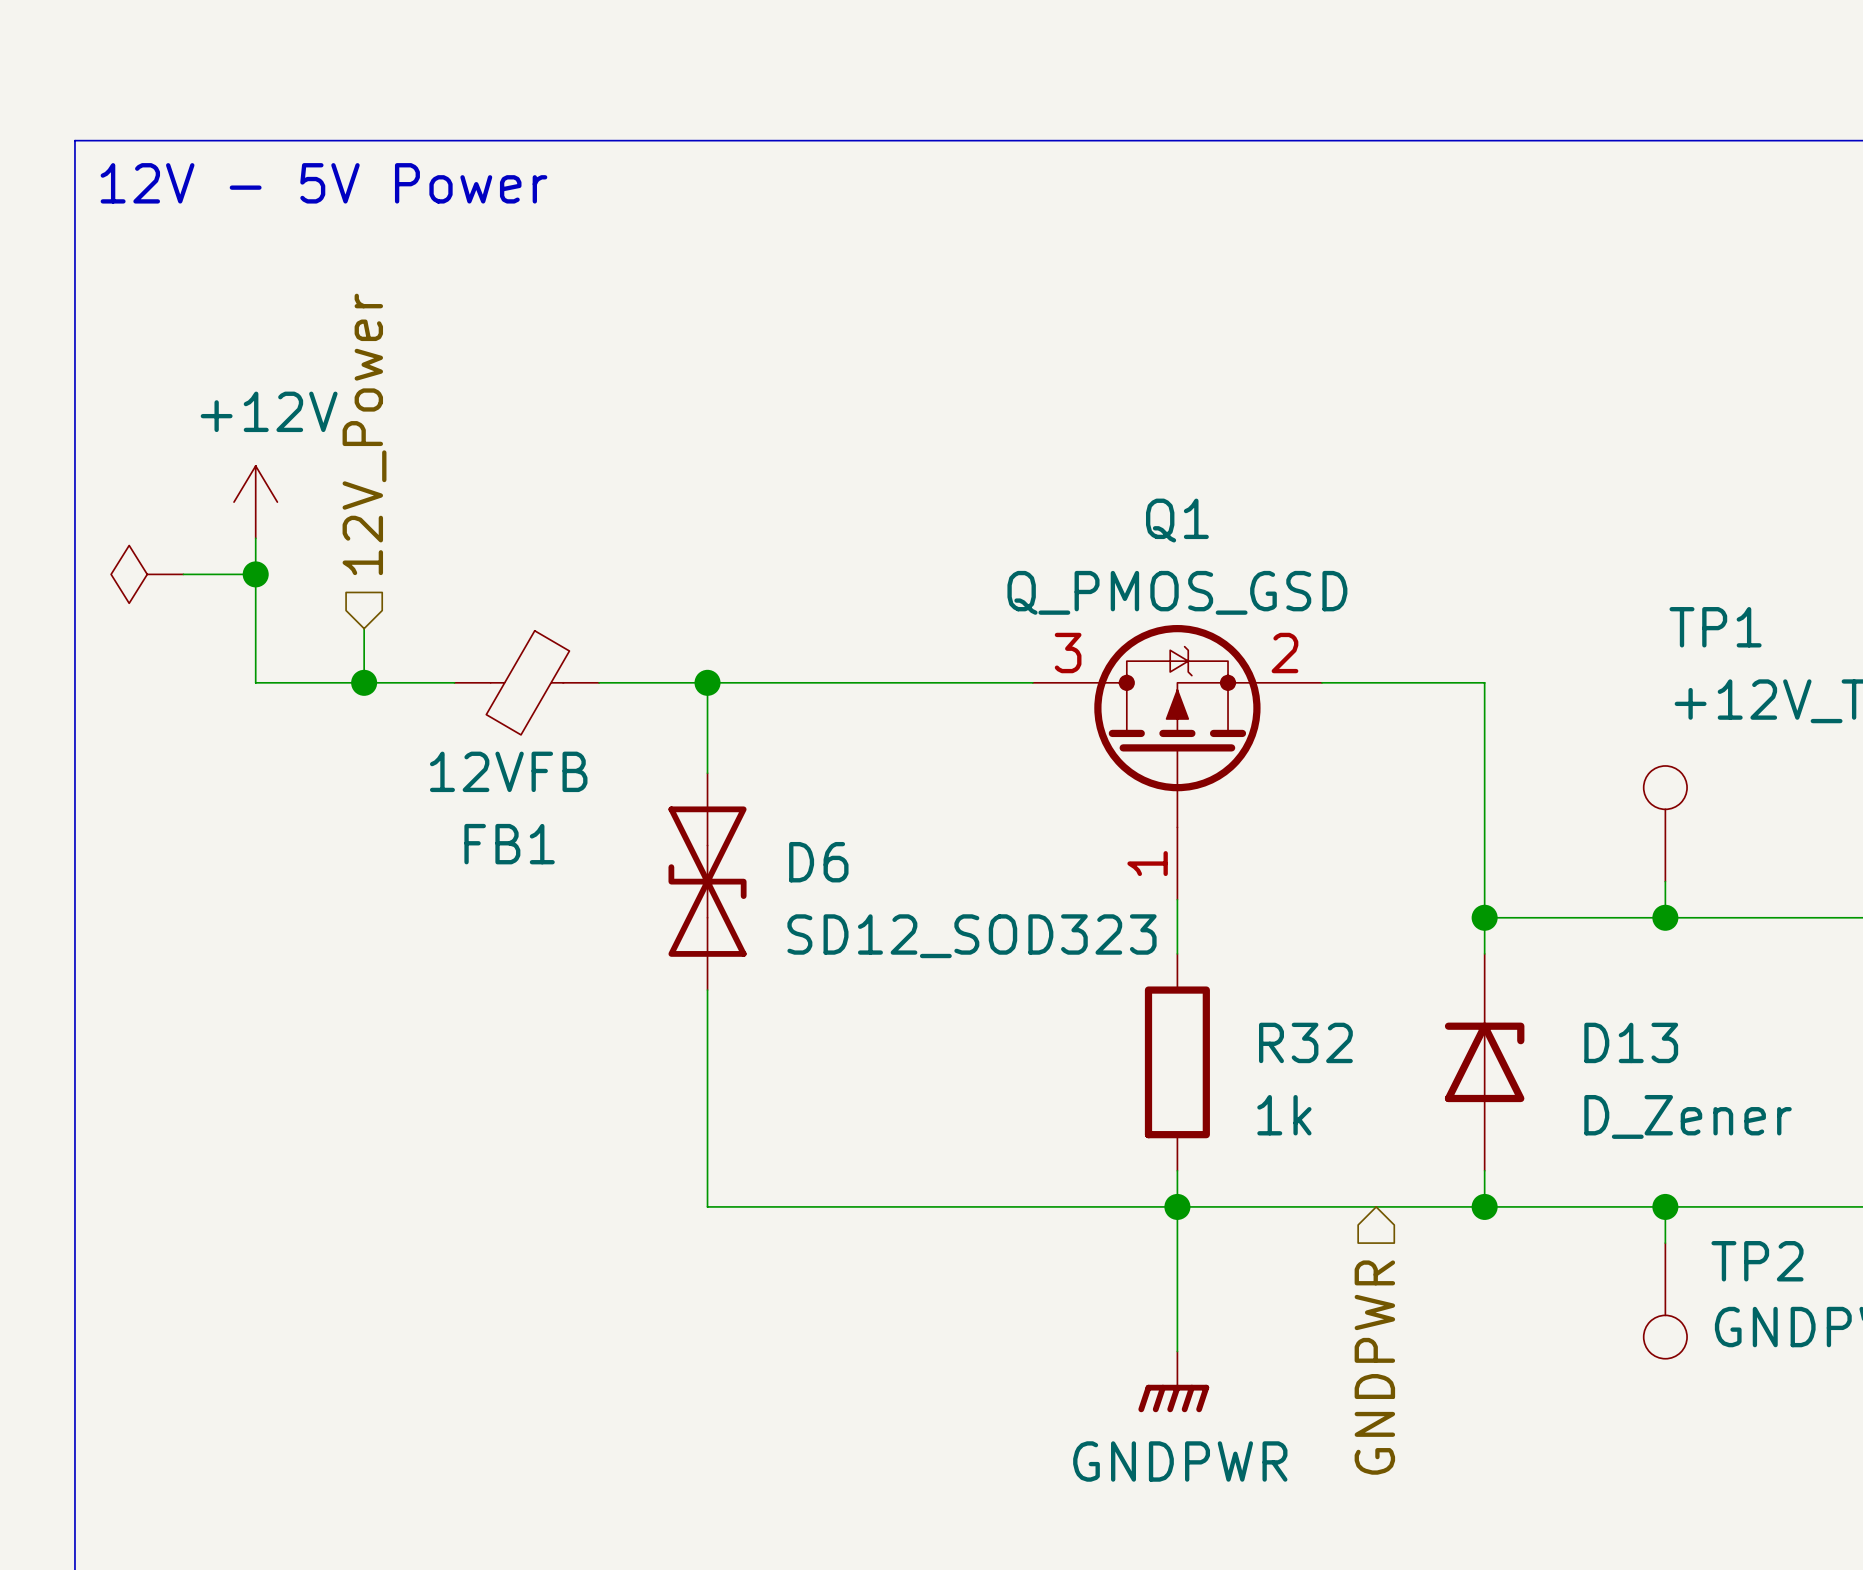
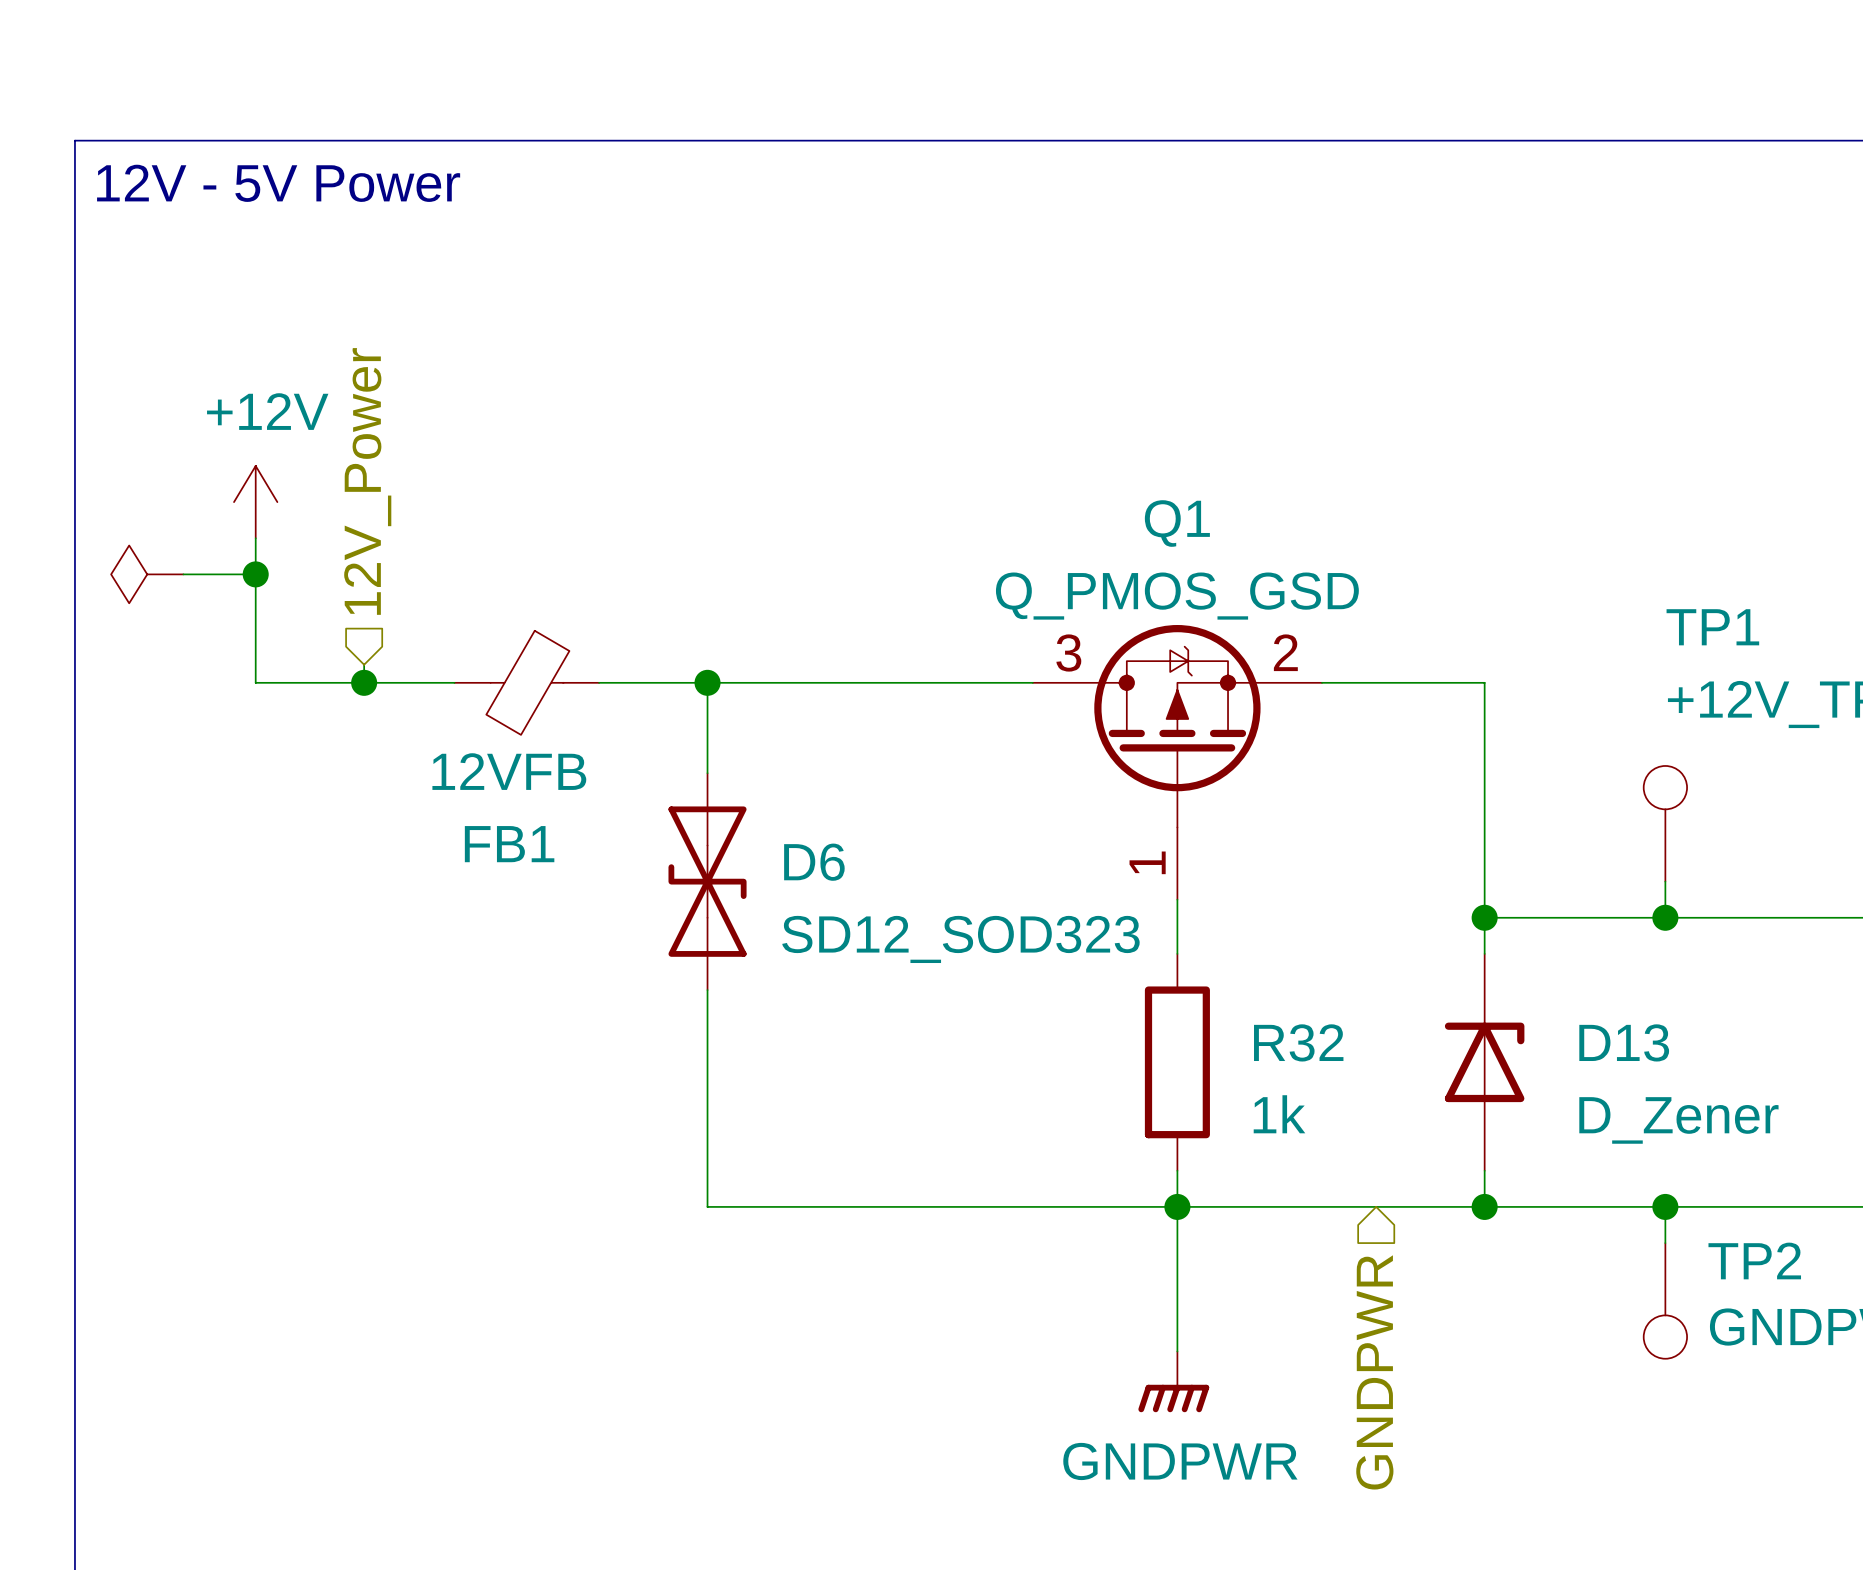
hierarchical label position: 12V_Power (364, 434) -> 12V_Power (367, 481)
wire: (364, 628) (364, 664) -> none

